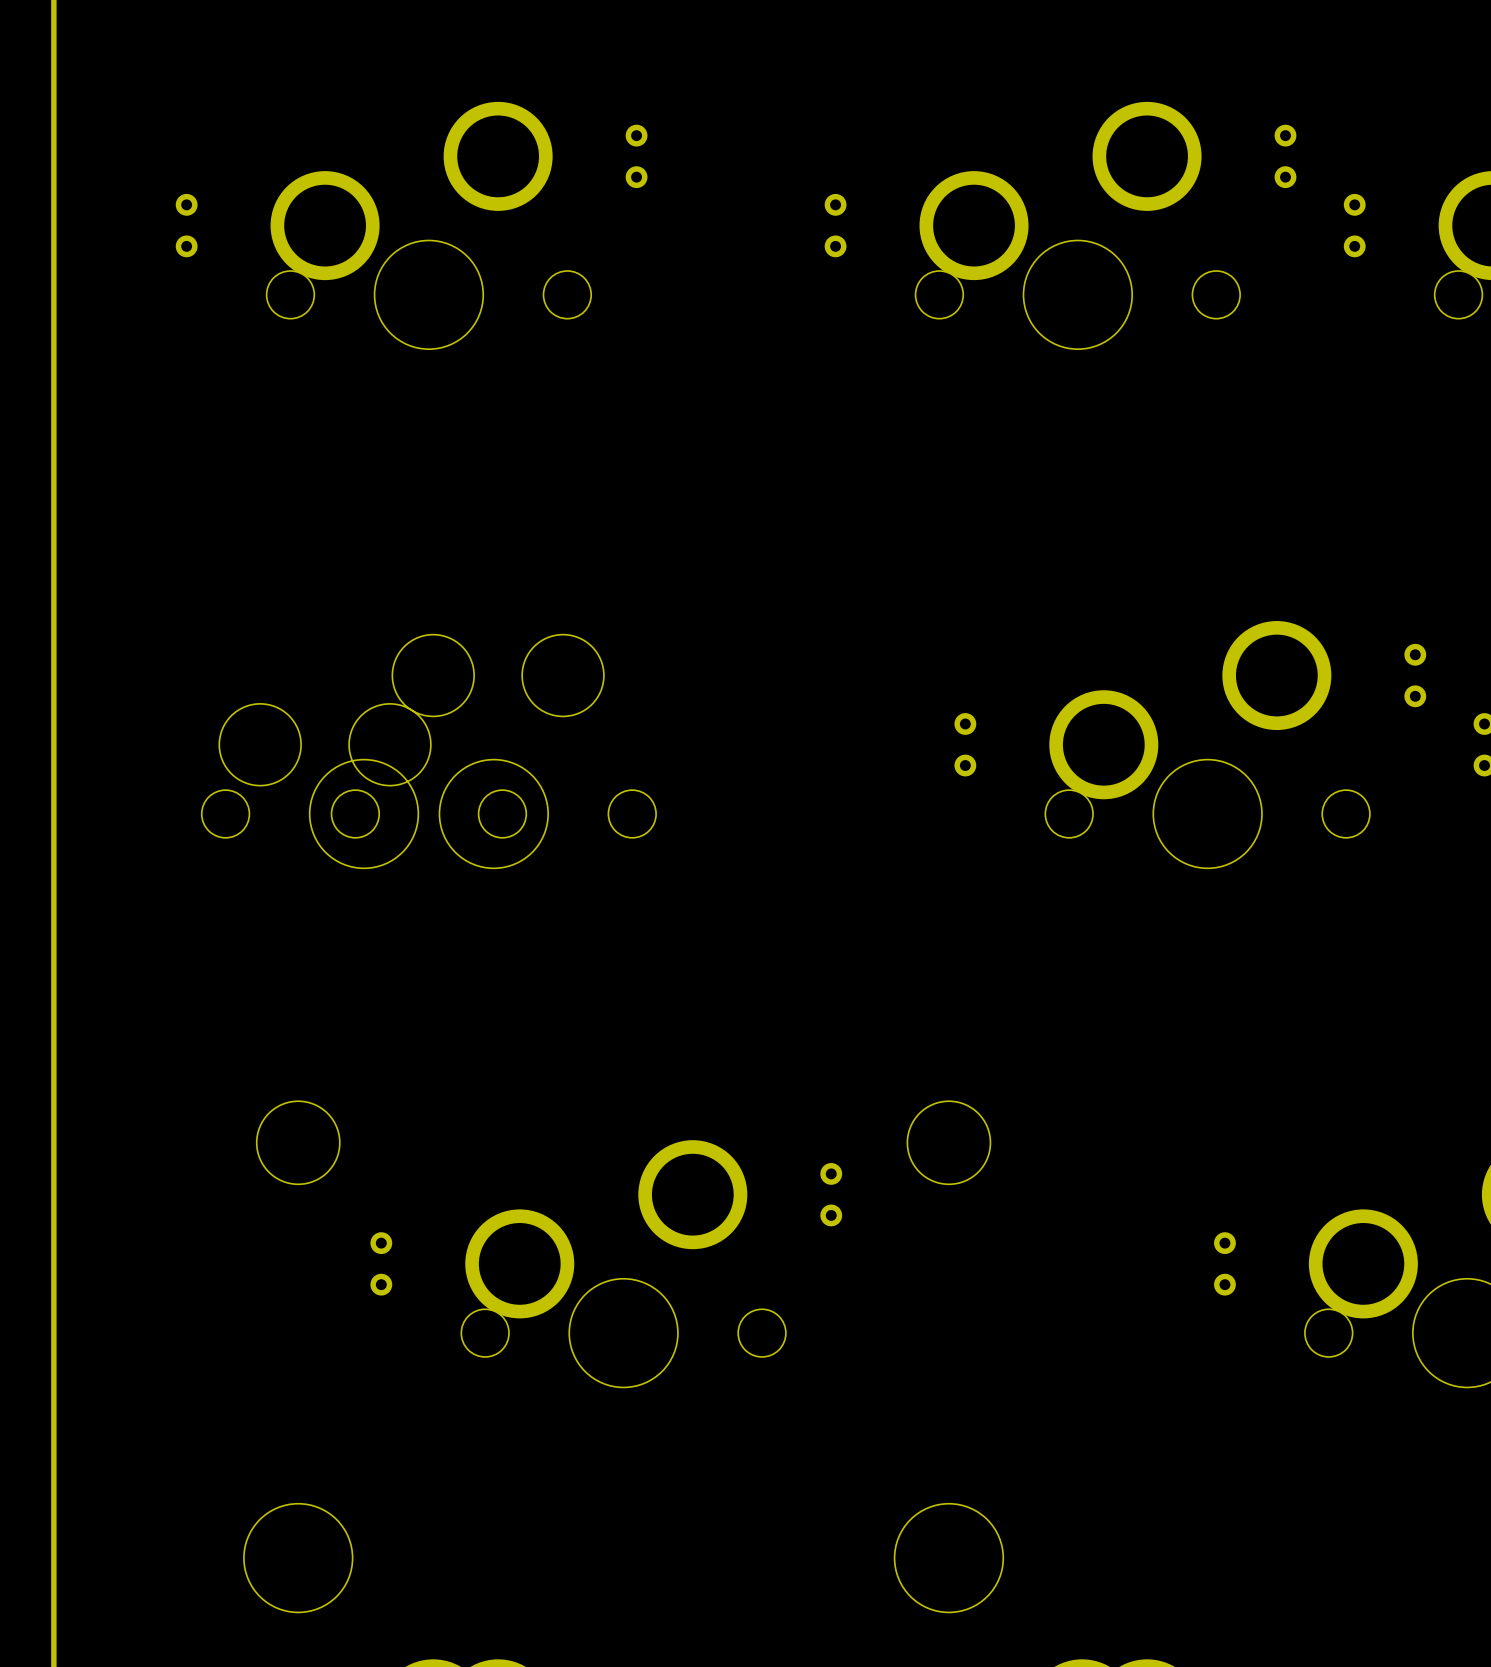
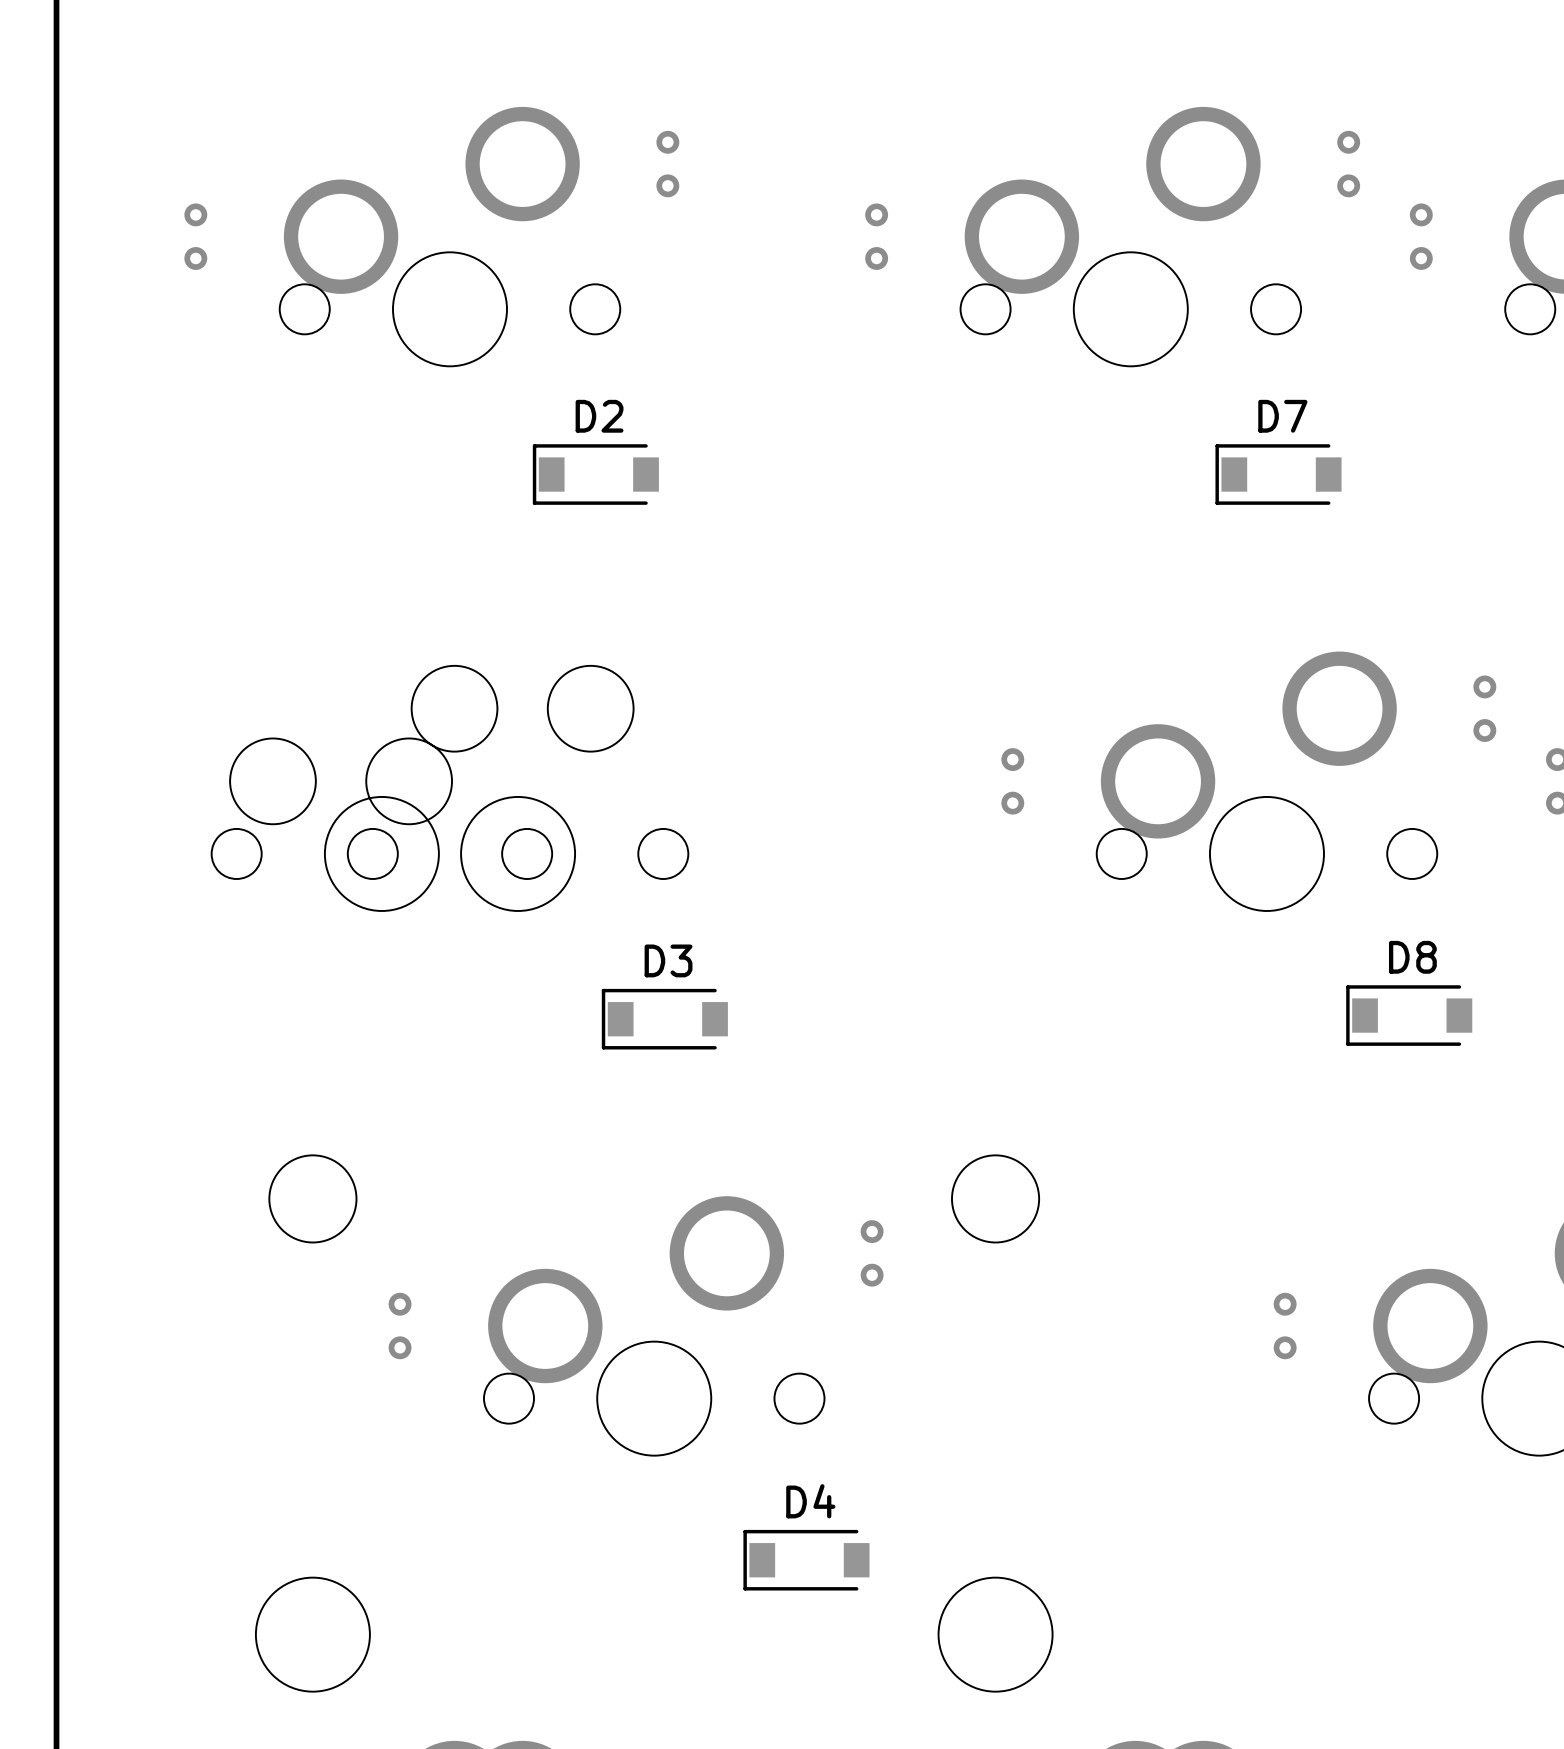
D2: none -> (595, 474)
D7: none -> (1278, 474)
D8: none -> (1409, 1015)
D3: none -> (664, 1019)
D4: none -> (806, 1560)

